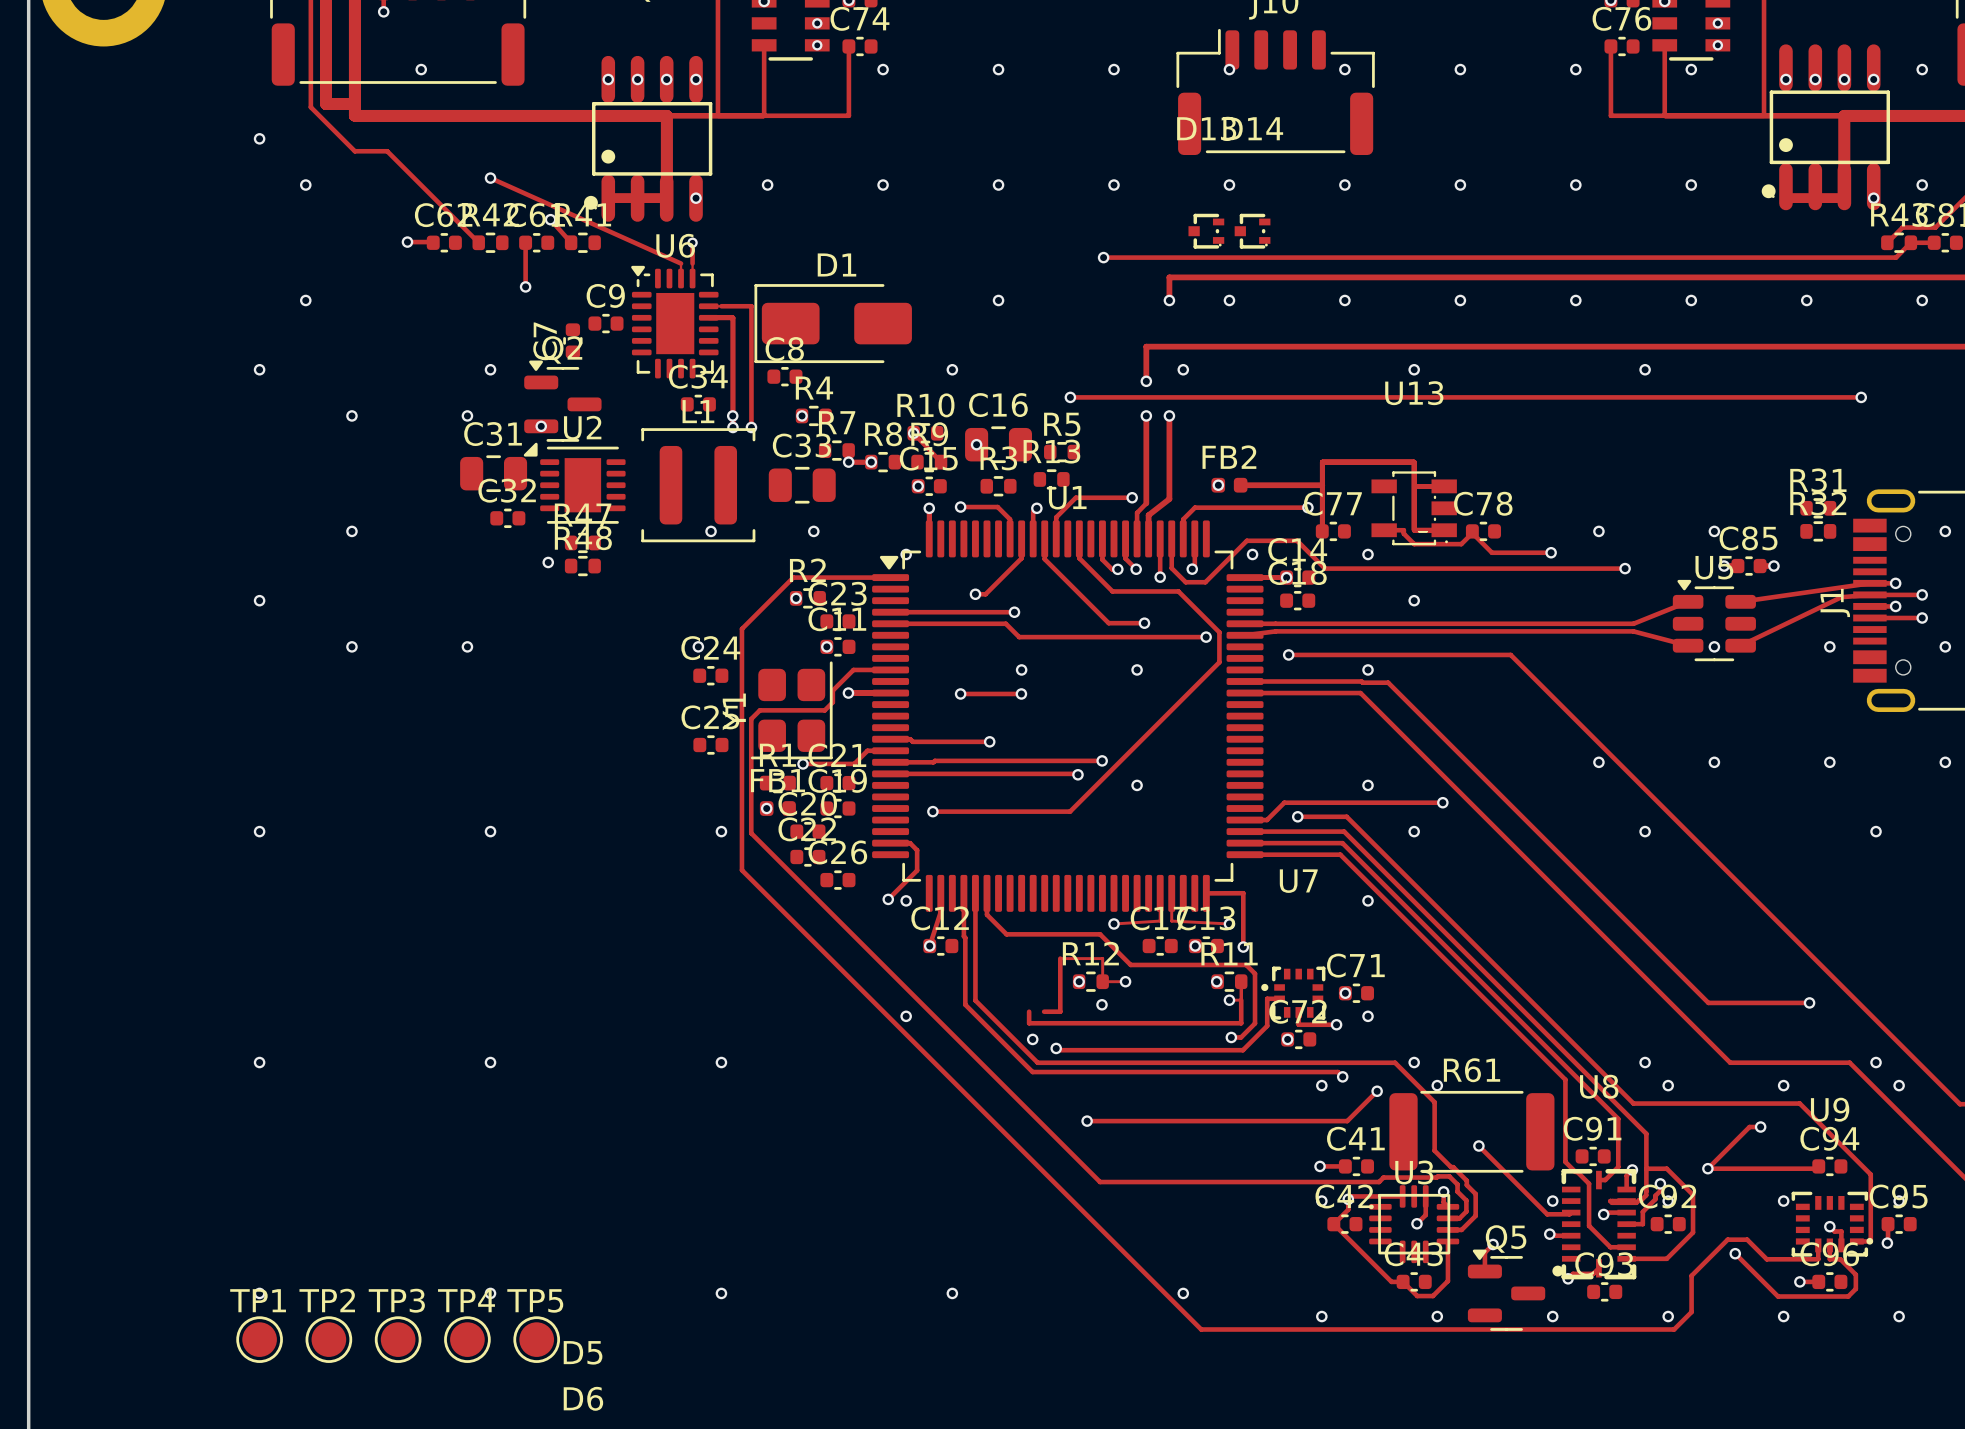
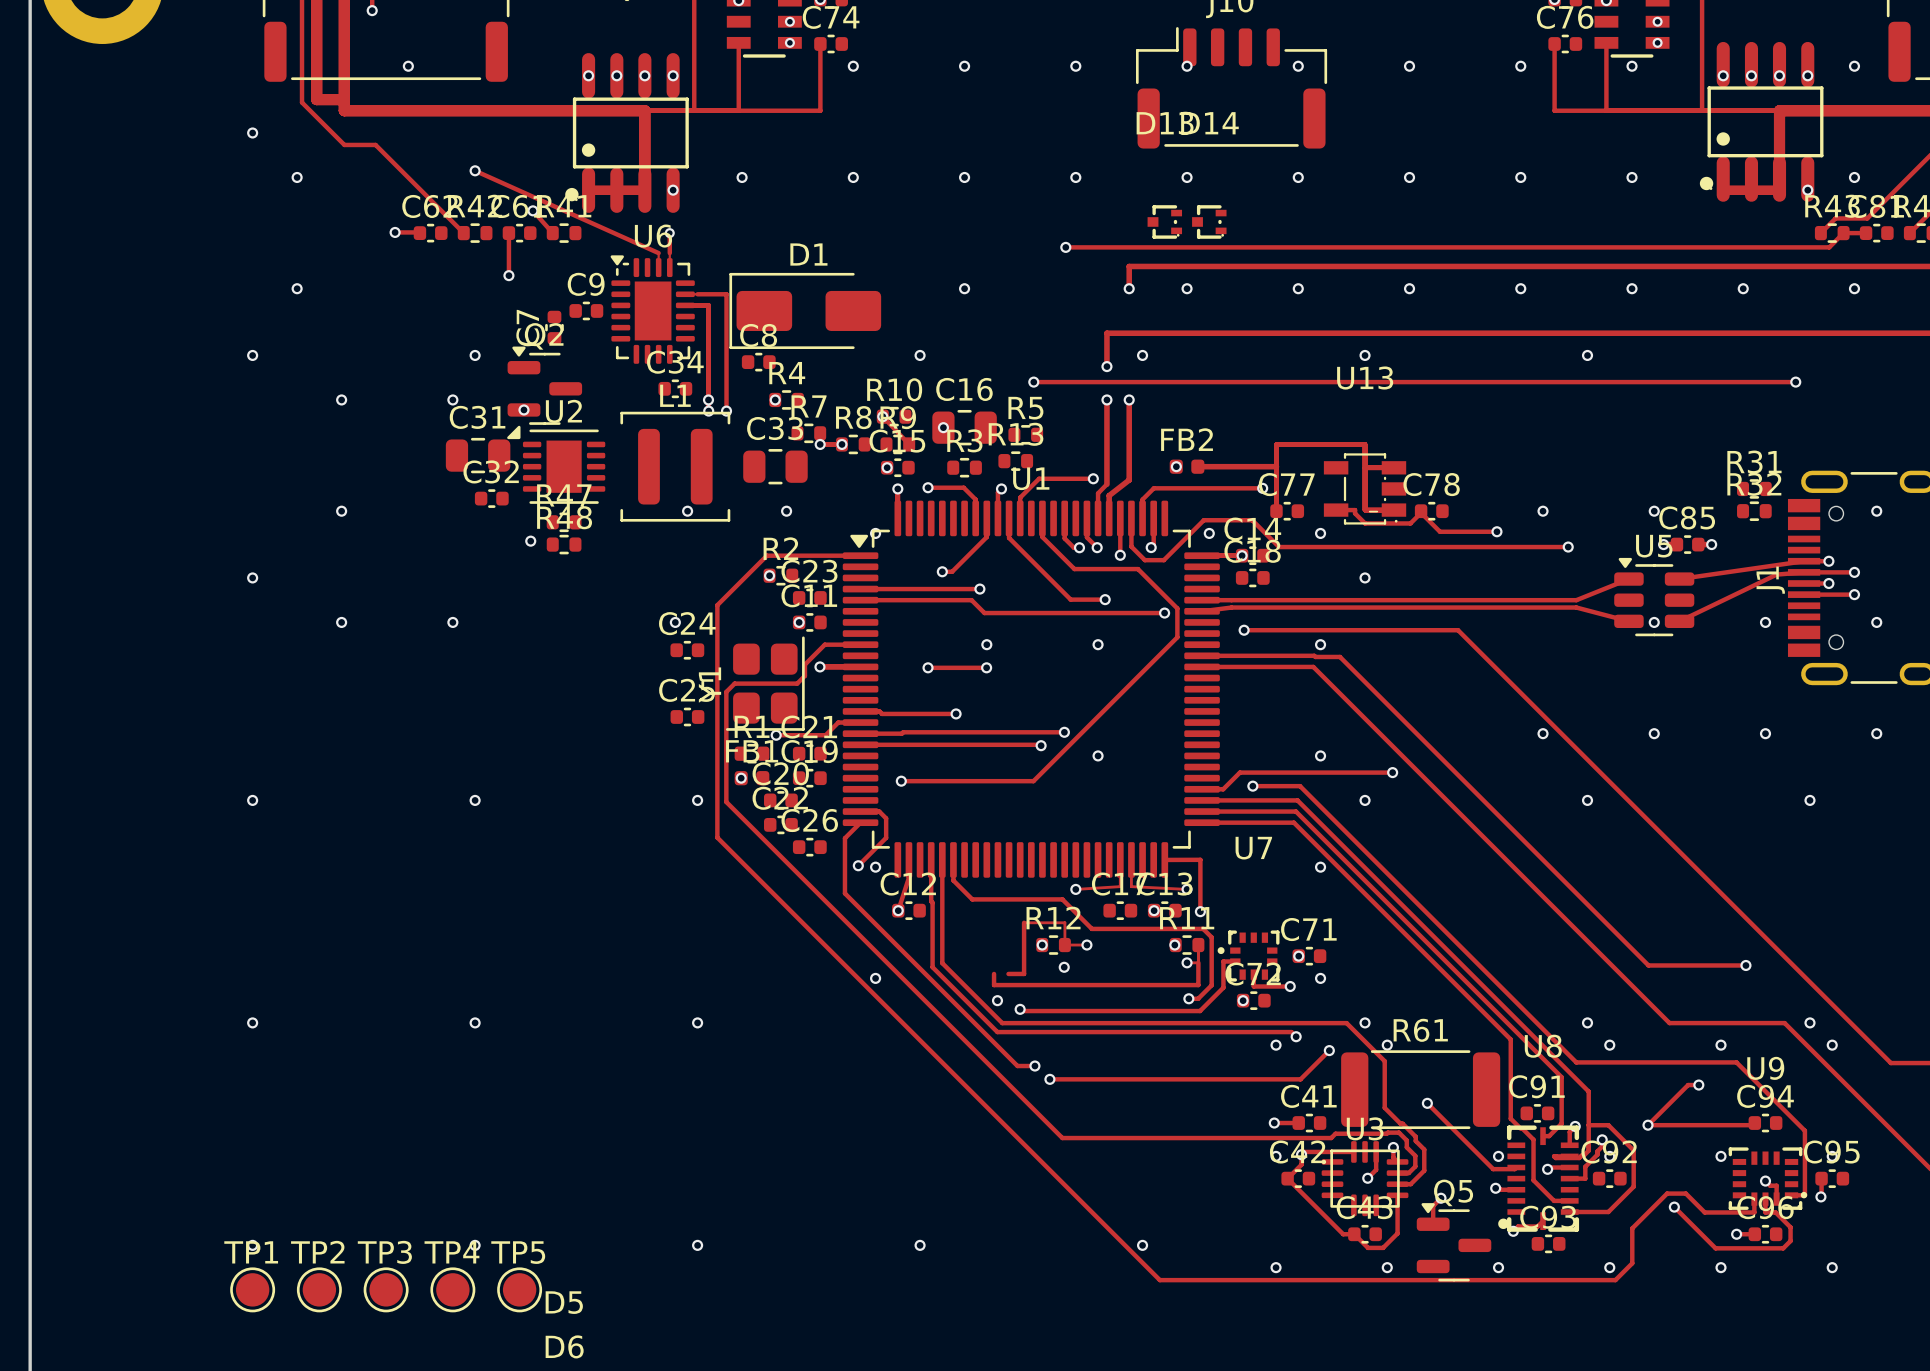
track: none -> (860, 822) (844, 838) (844, 893) (1017, 1066) (1034, 1066)
via: none -> (1034, 1066)

